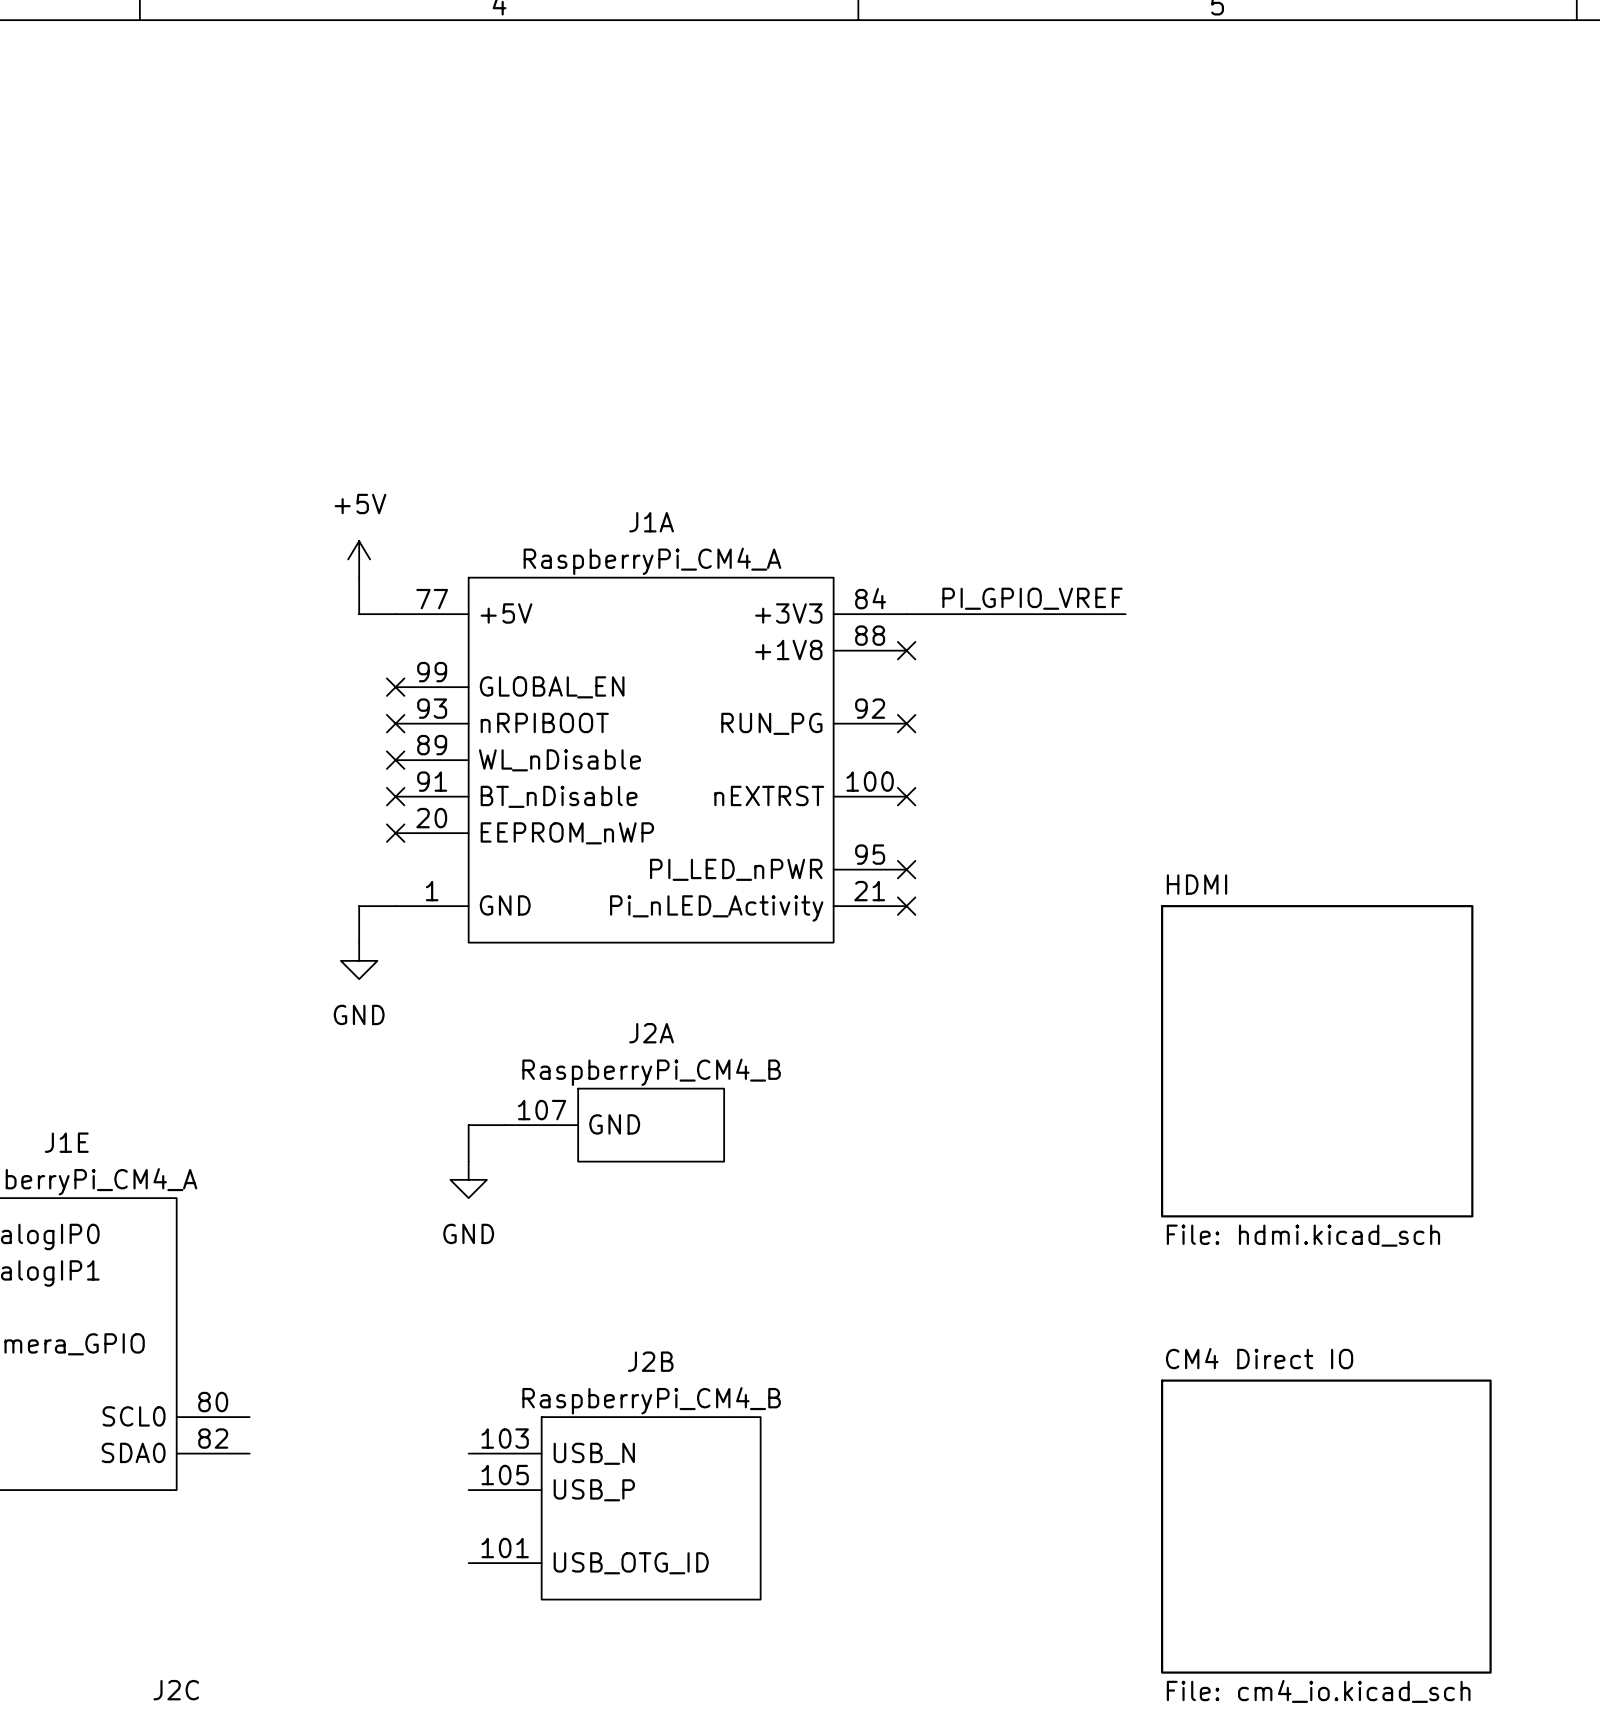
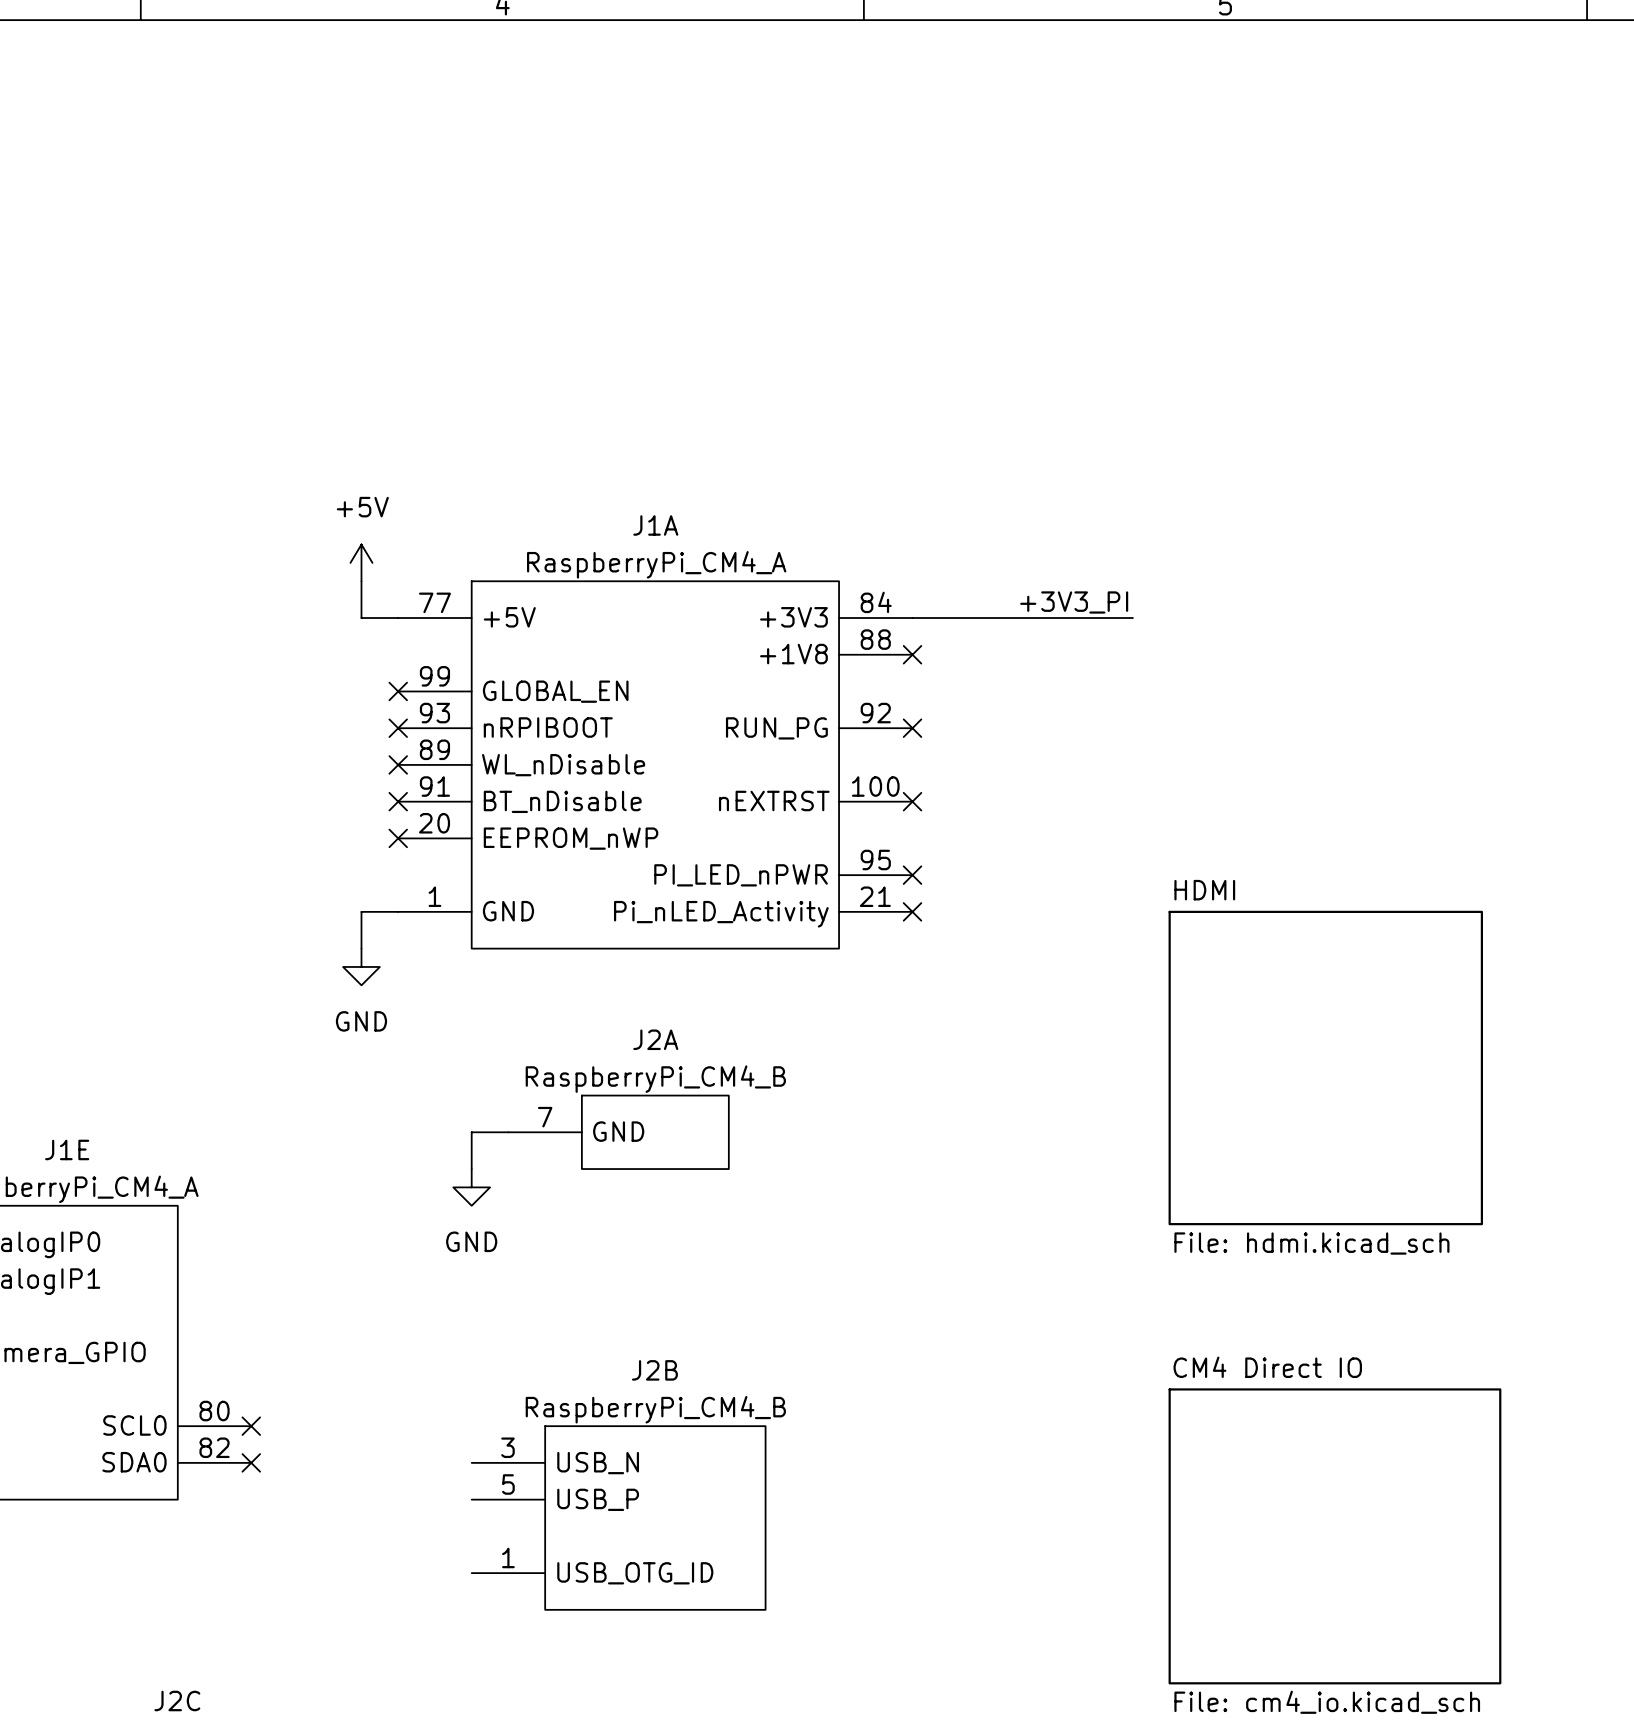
label: PI_GPIO_VREF (1032, 598) -> +3V3_PI (1074, 602)
J2A pin number: 107 (542, 1110) -> 7 (545, 1117)
no-connect mark: none -> (251, 1426)
J2B pin number: 103 (505, 1438) -> 3 (507, 1447)
no-connect mark: none -> (251, 1462)
J2B pin number: 105 (505, 1475) -> 5 (508, 1484)
J2B pin number: 101 (505, 1548) -> 1 (508, 1557)

